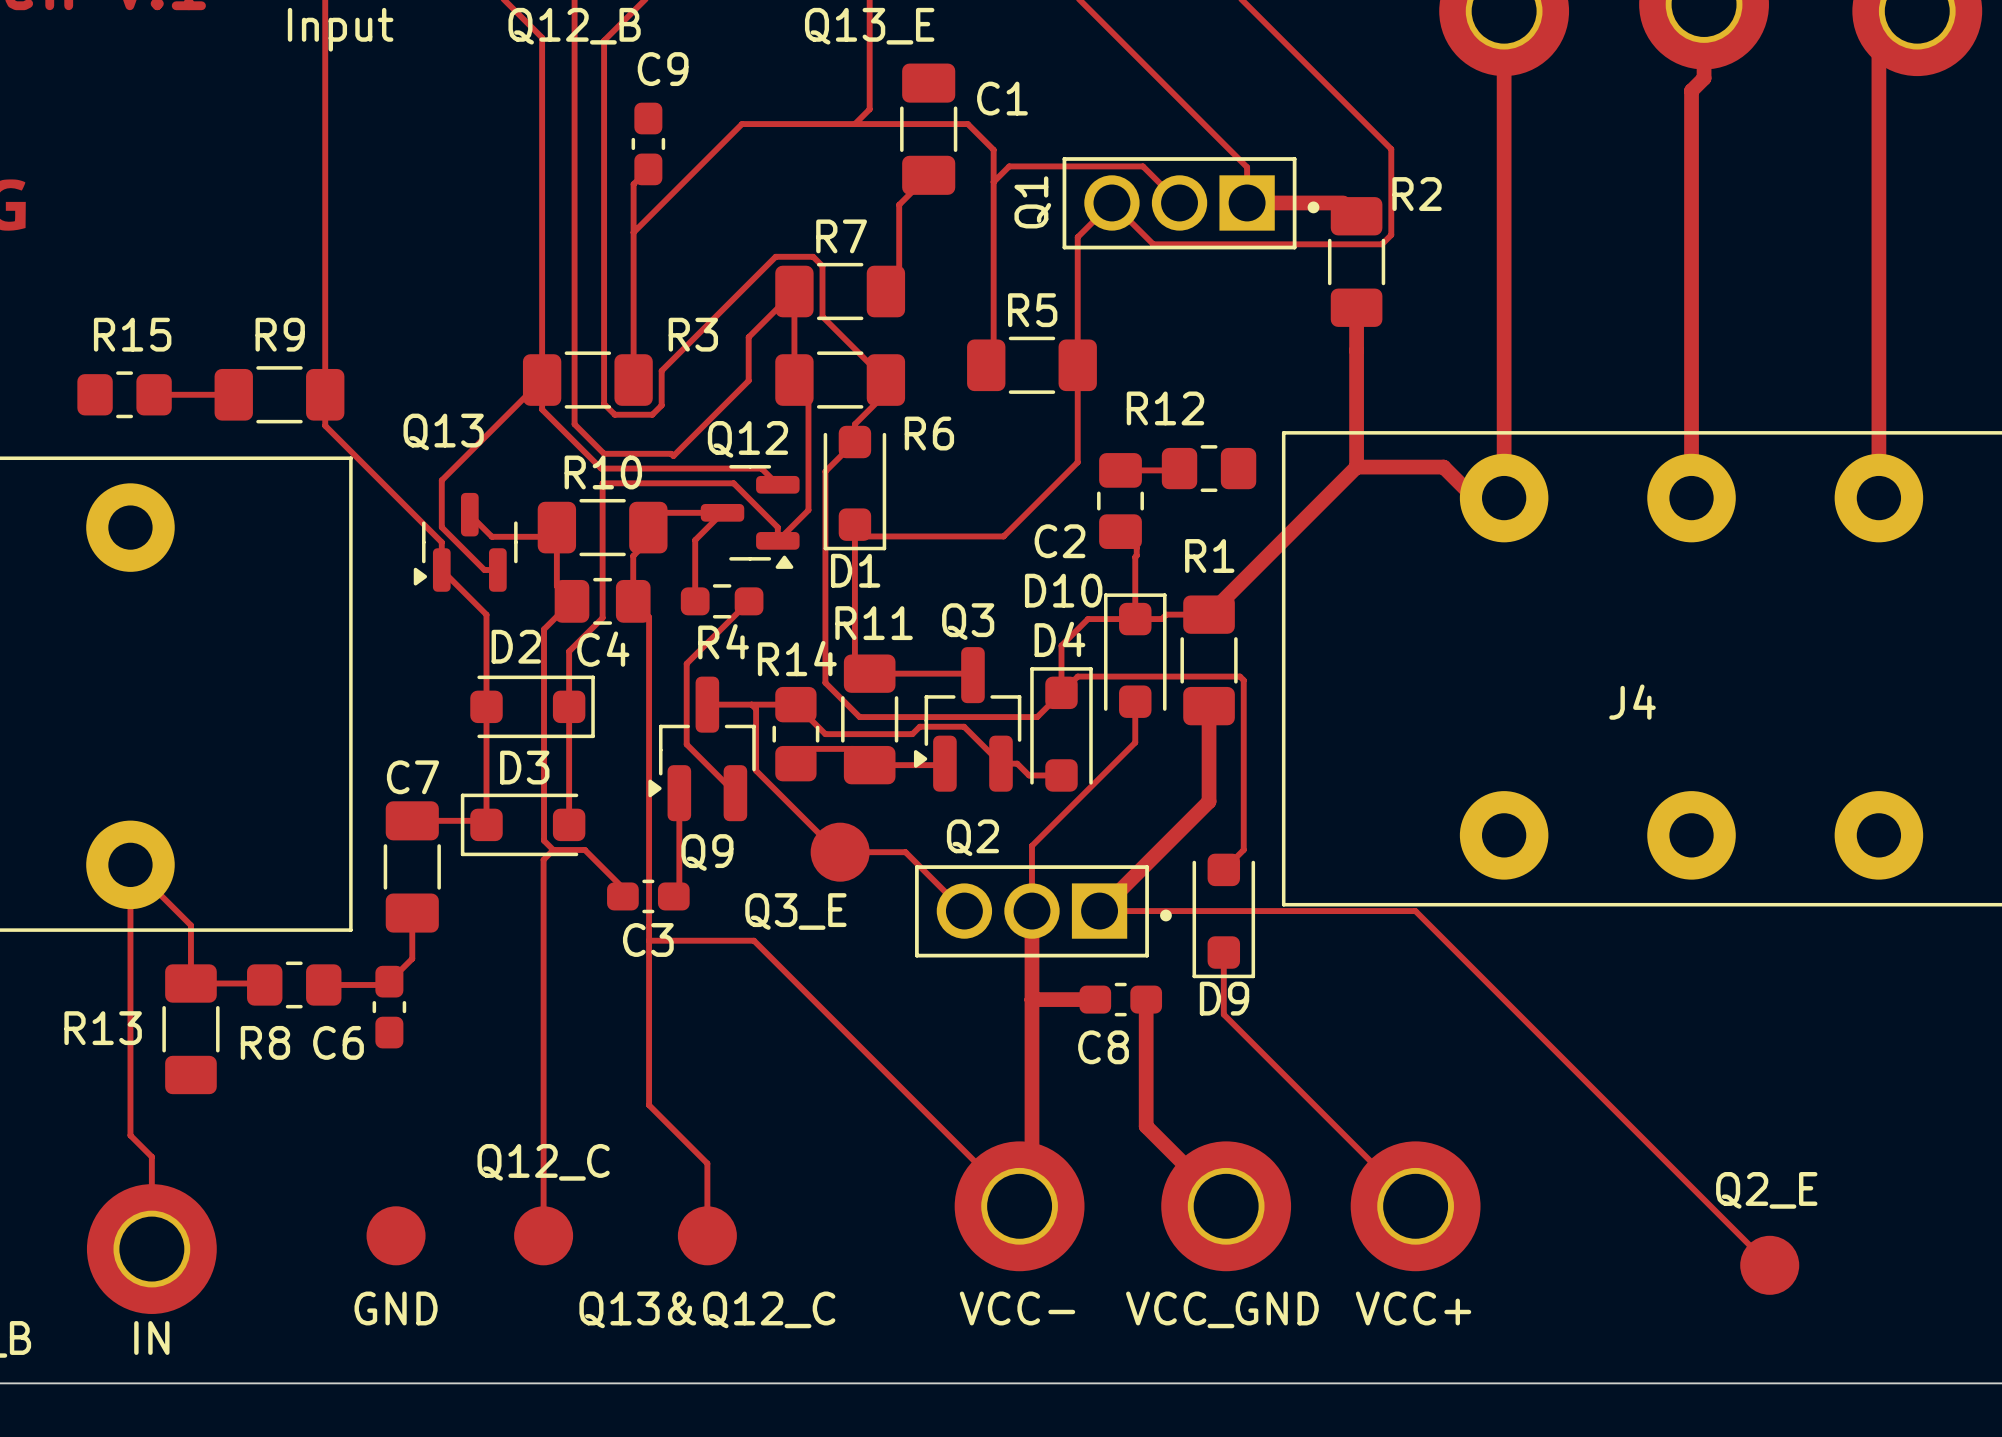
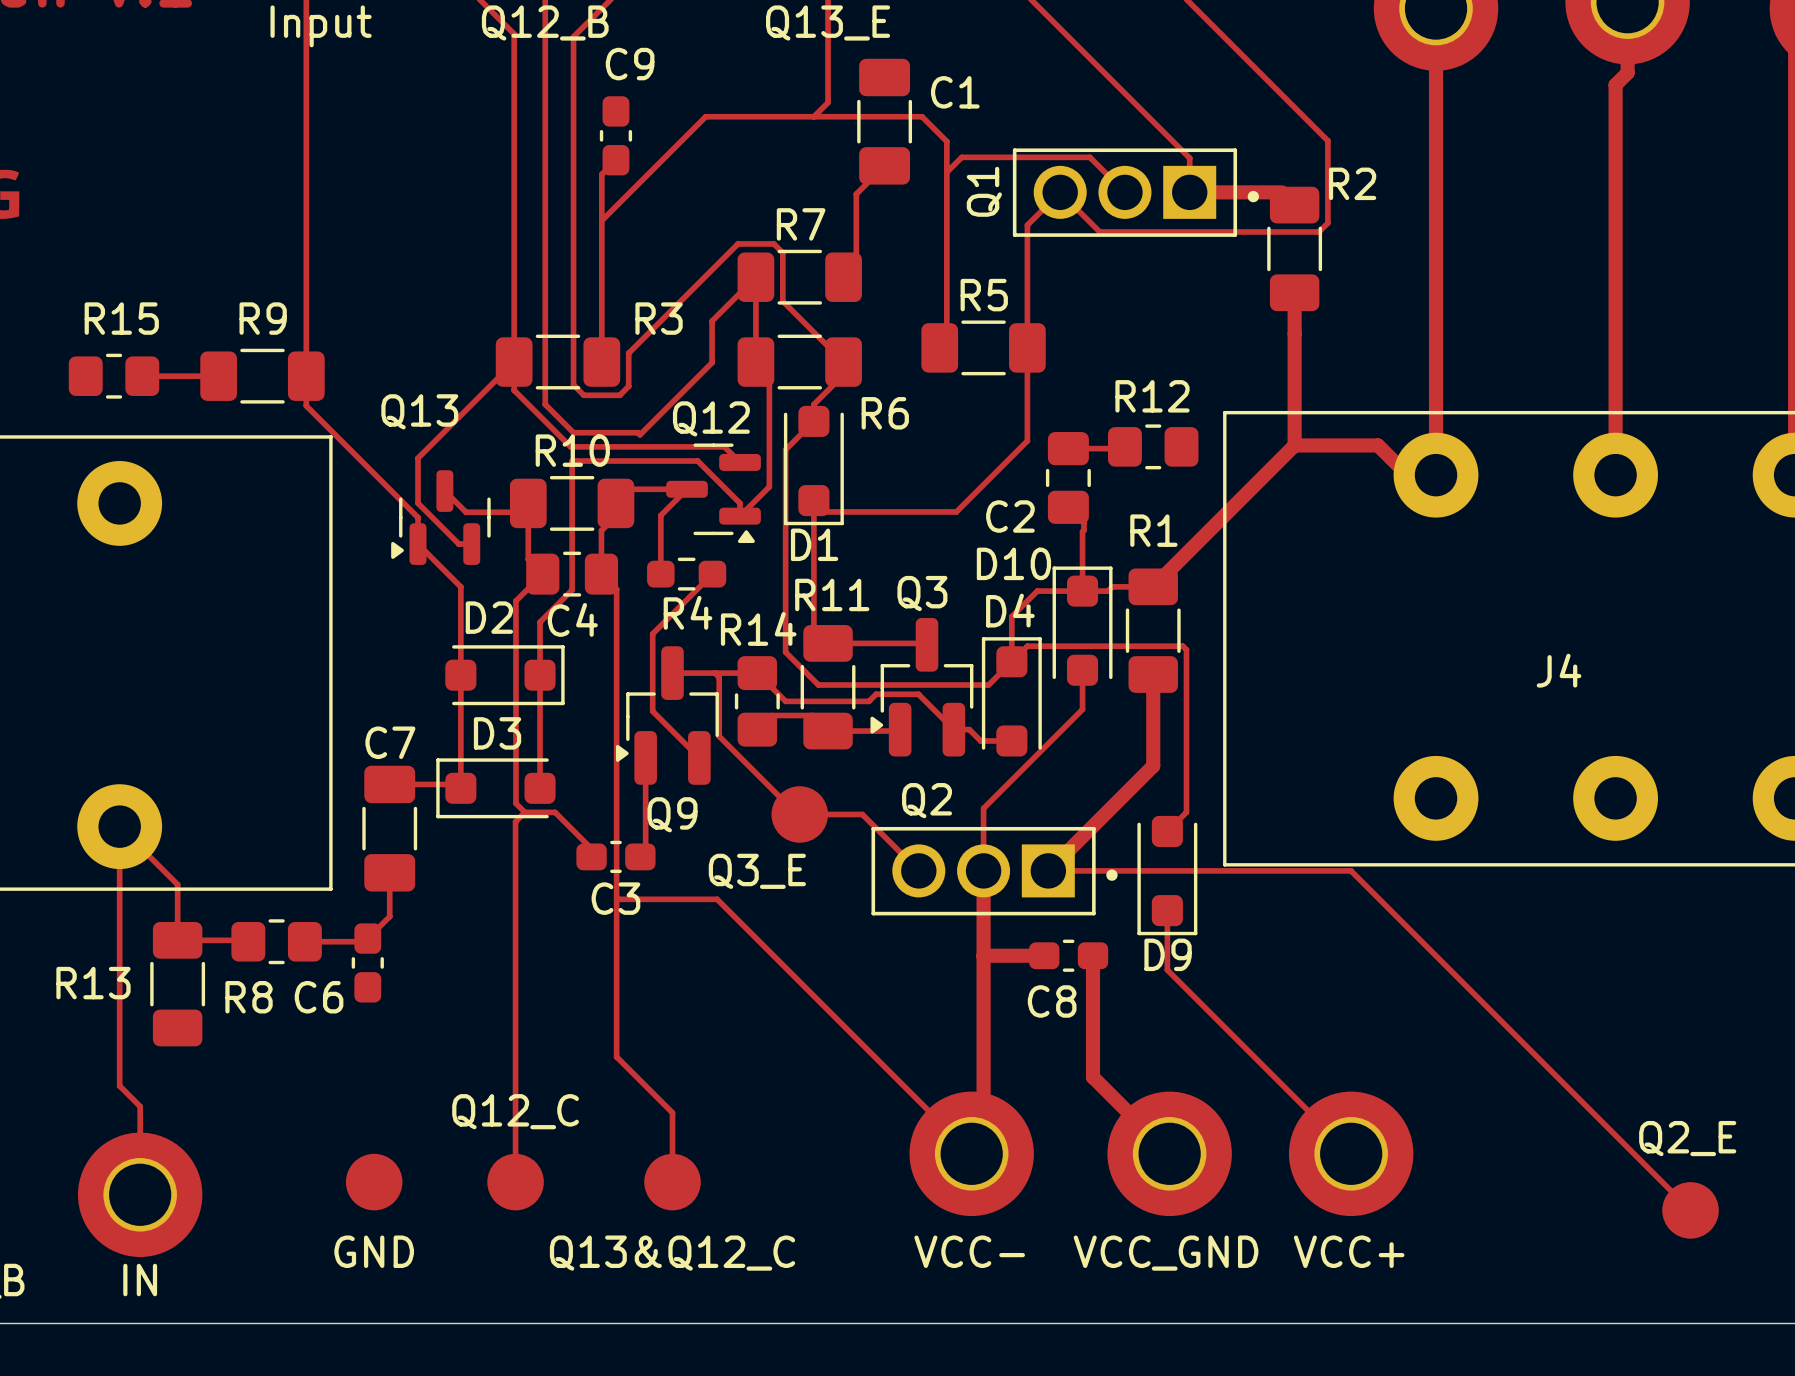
R12 name position: R12 (1165, 408) -> R12 (1152, 396)

